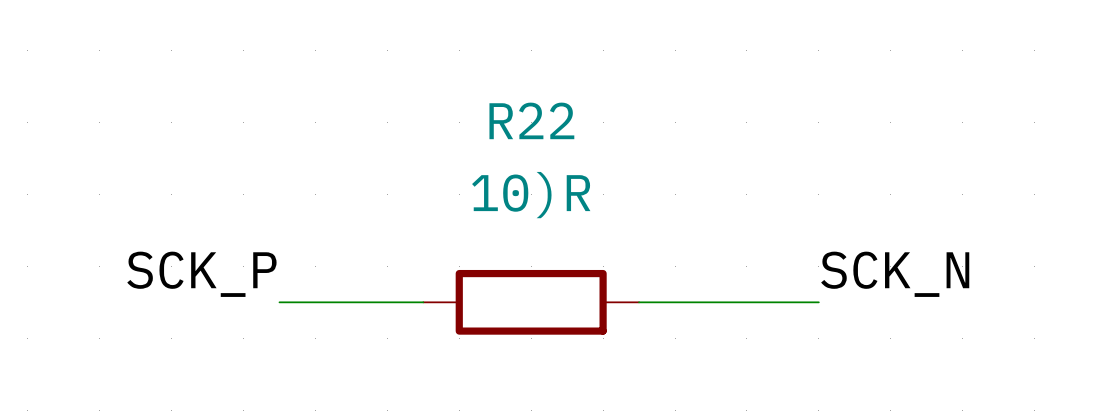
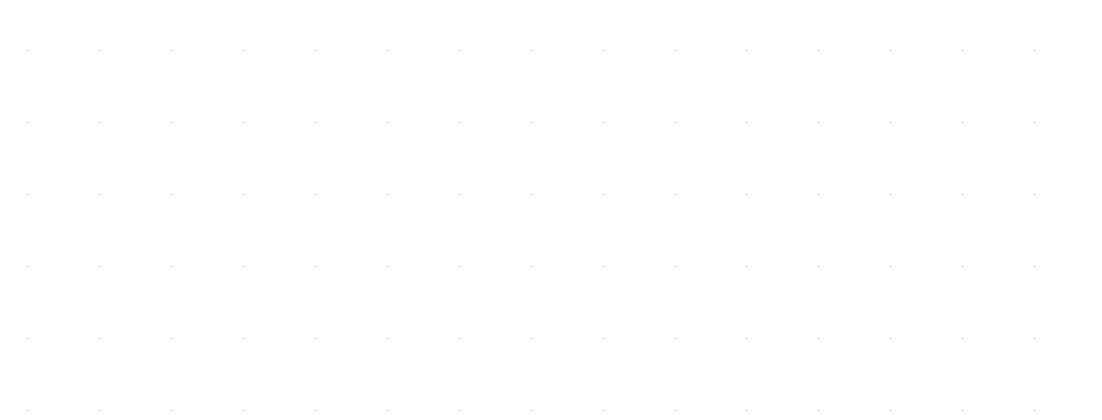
label: SCK_P (201, 274) -> none
label: SCK_N (895, 274) -> none
wire: (279, 302) (423, 302) -> none
R22: 10)R (531, 302) -> none
wire: (639, 302) (818, 302) -> none

